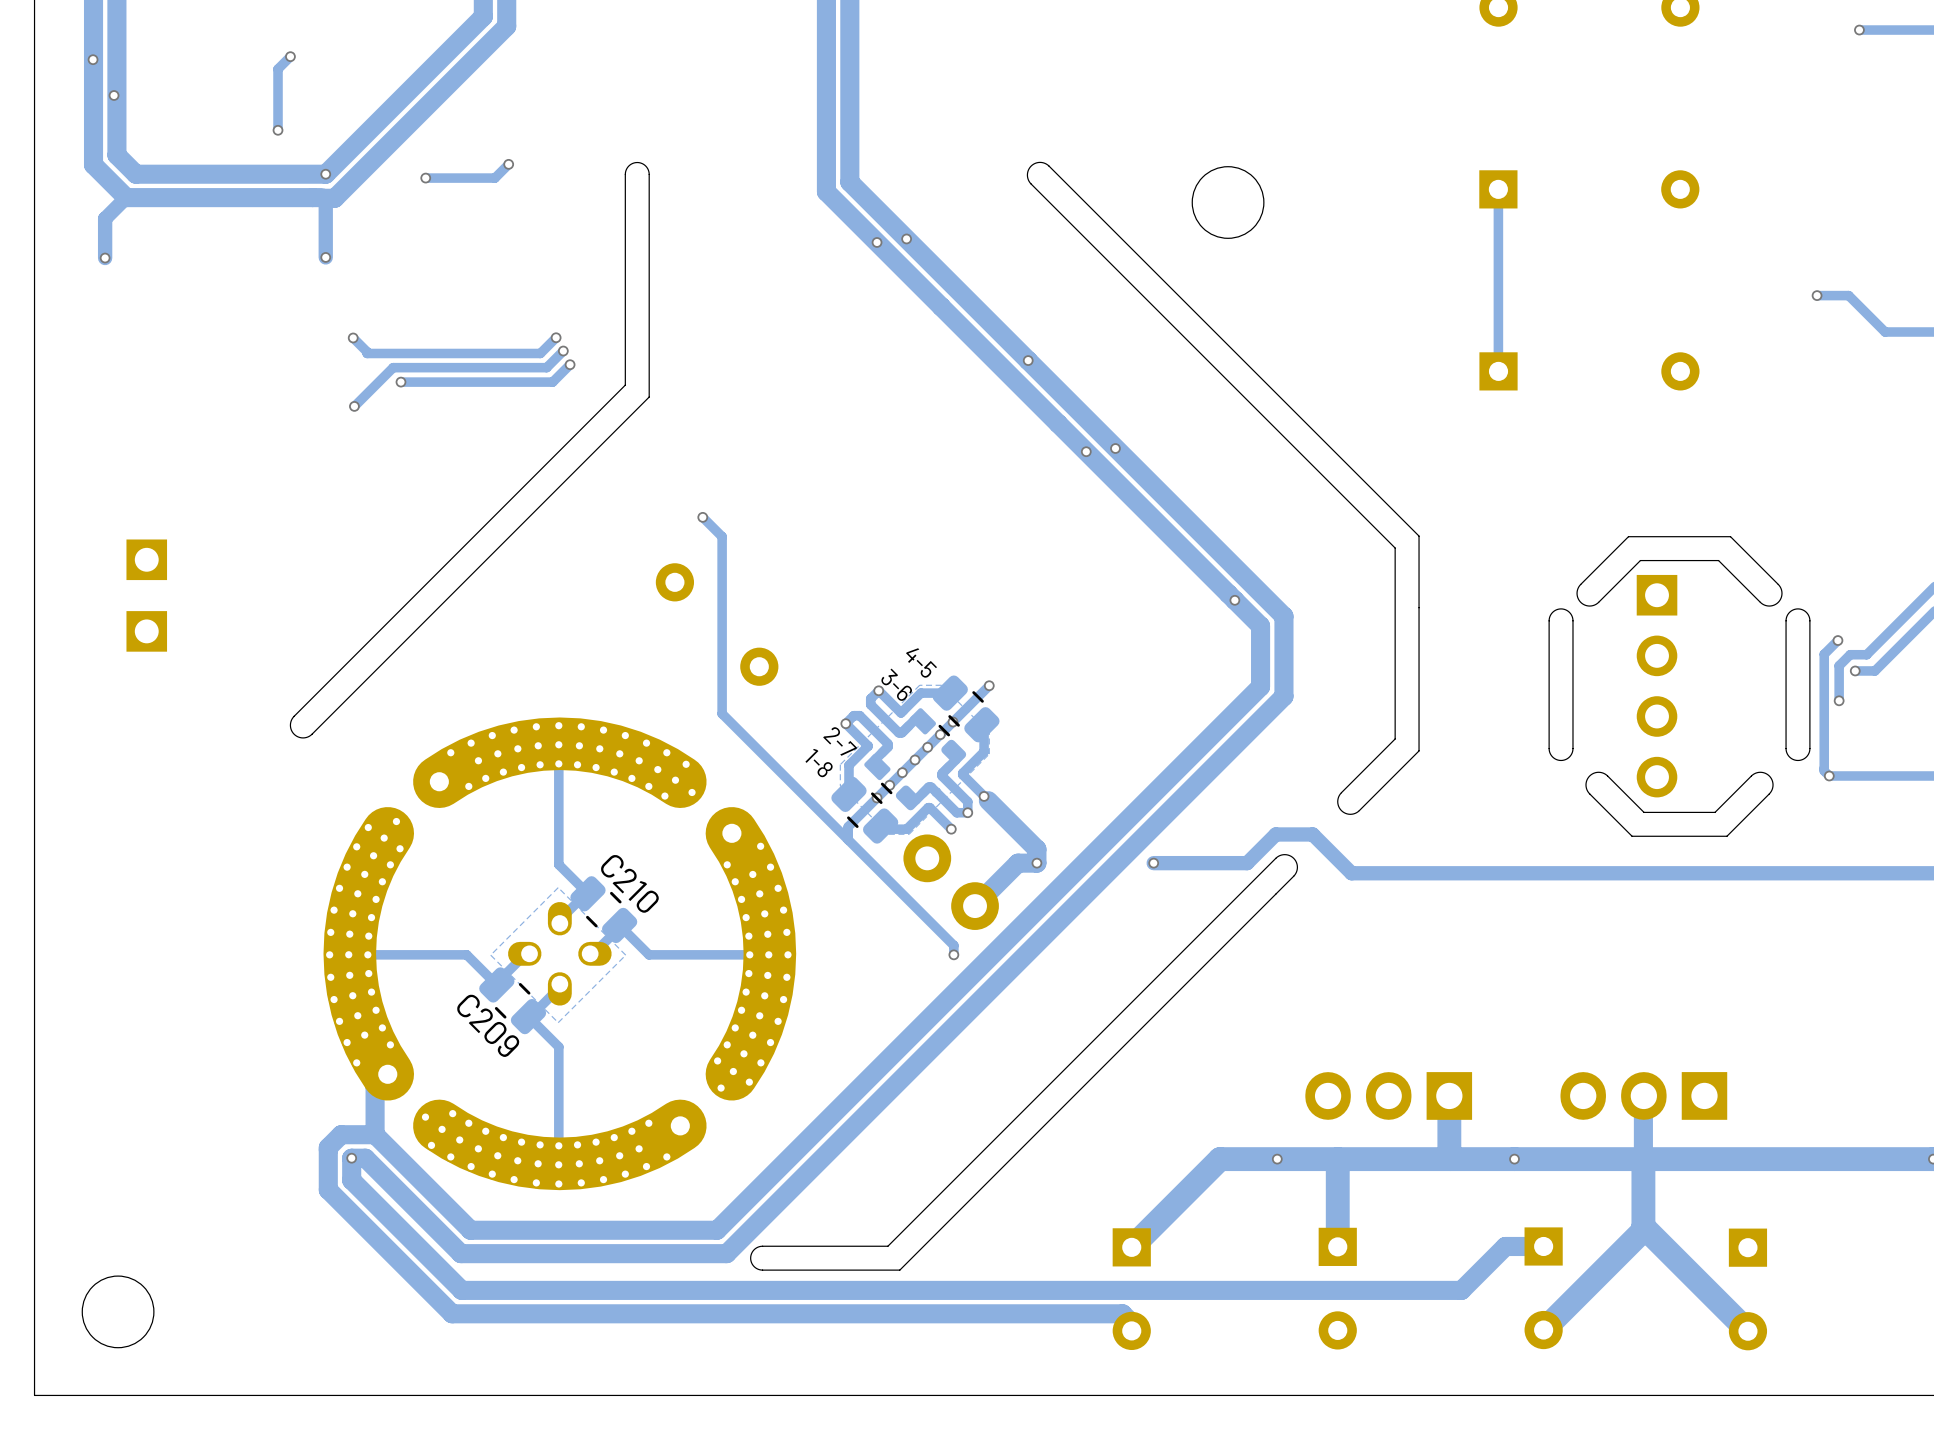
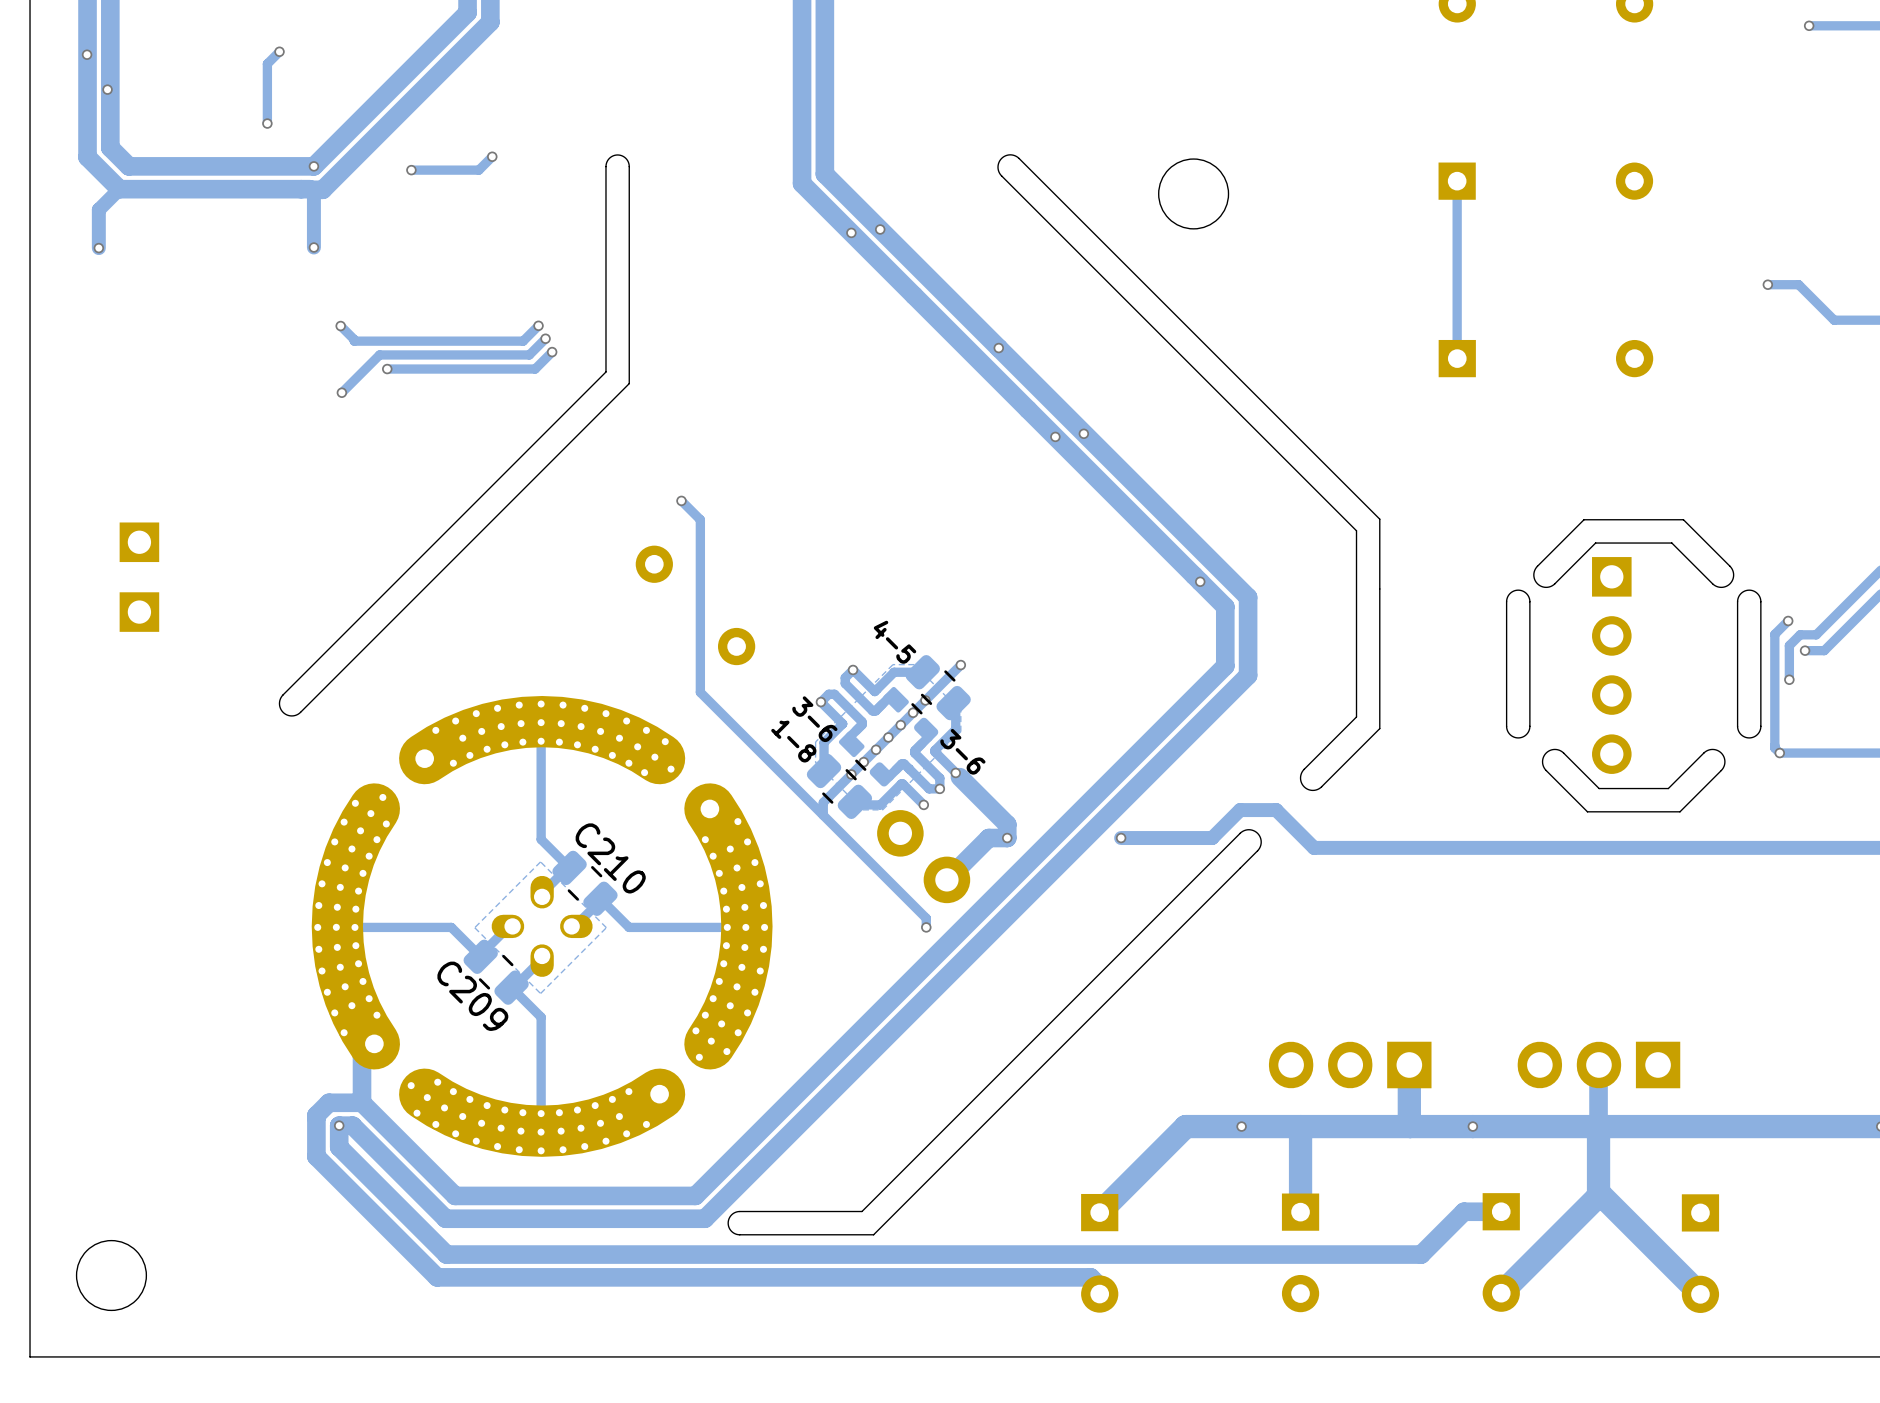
3-6 name position: 3-6 (896, 684) -> 3-6 (962, 751)
2-7 name: 2-7 (840, 741) -> 3-6 (814, 719)

